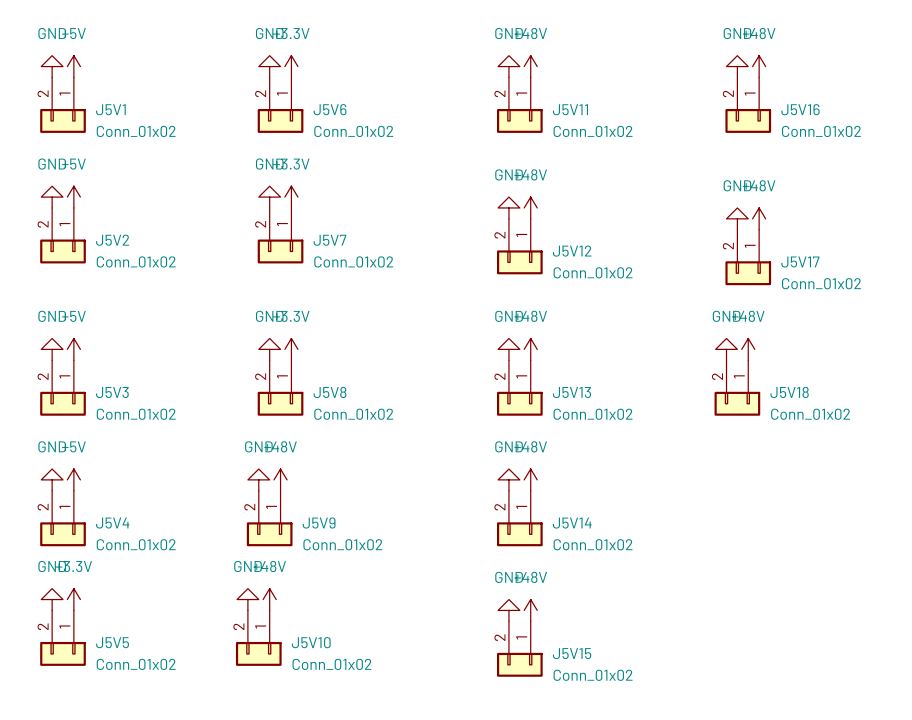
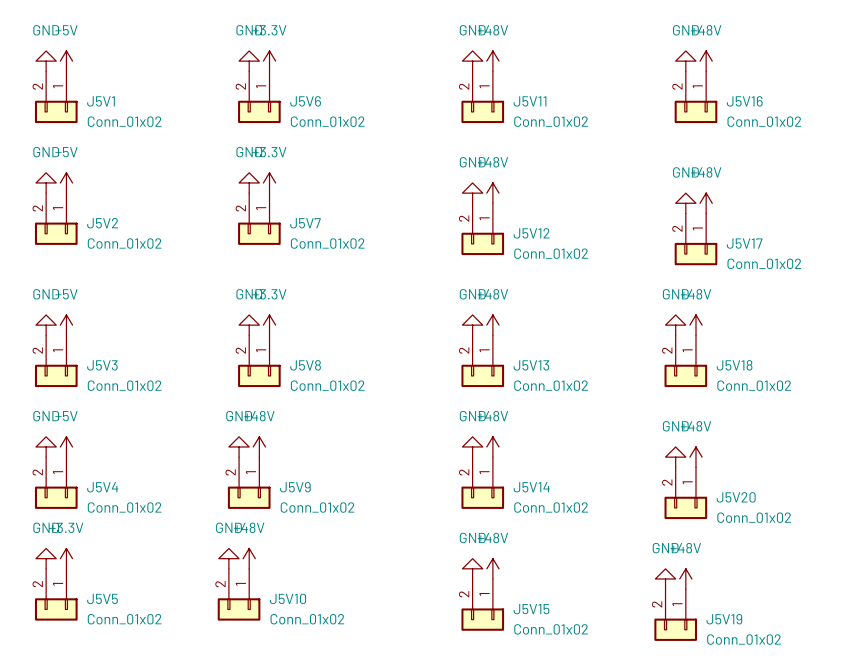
power symbol: none -> GND (675, 457)
power symbol: none -> +48V (695, 457)
J5V20: none -> Conn_01x02 (685, 493)
power symbol: none -> GND (665, 578)
power symbol: none -> +48V (685, 578)
J5V19: none -> Conn_01x02 (675, 615)

